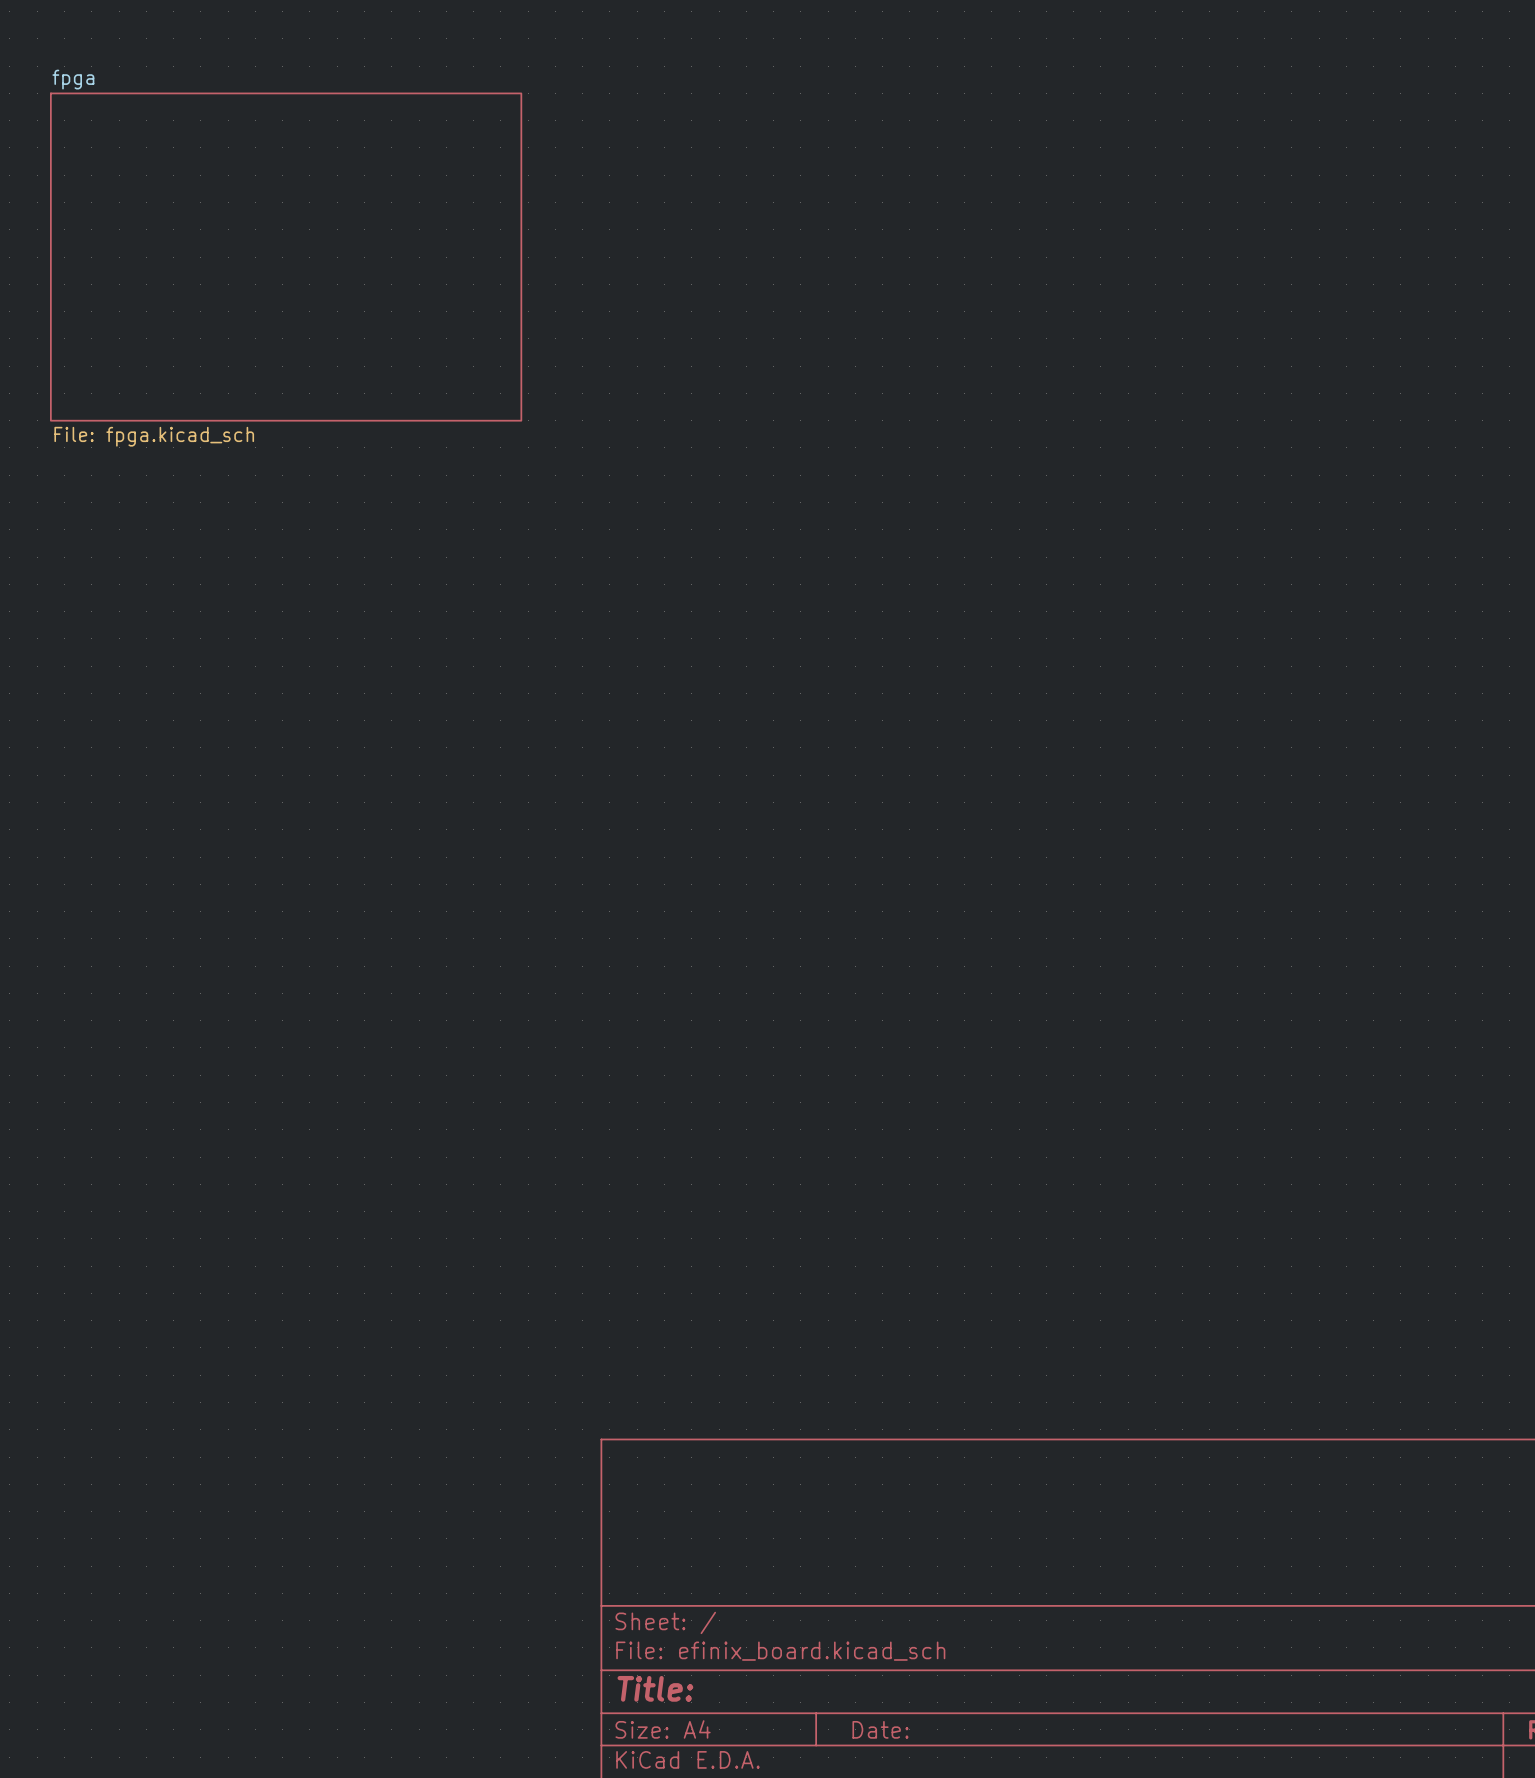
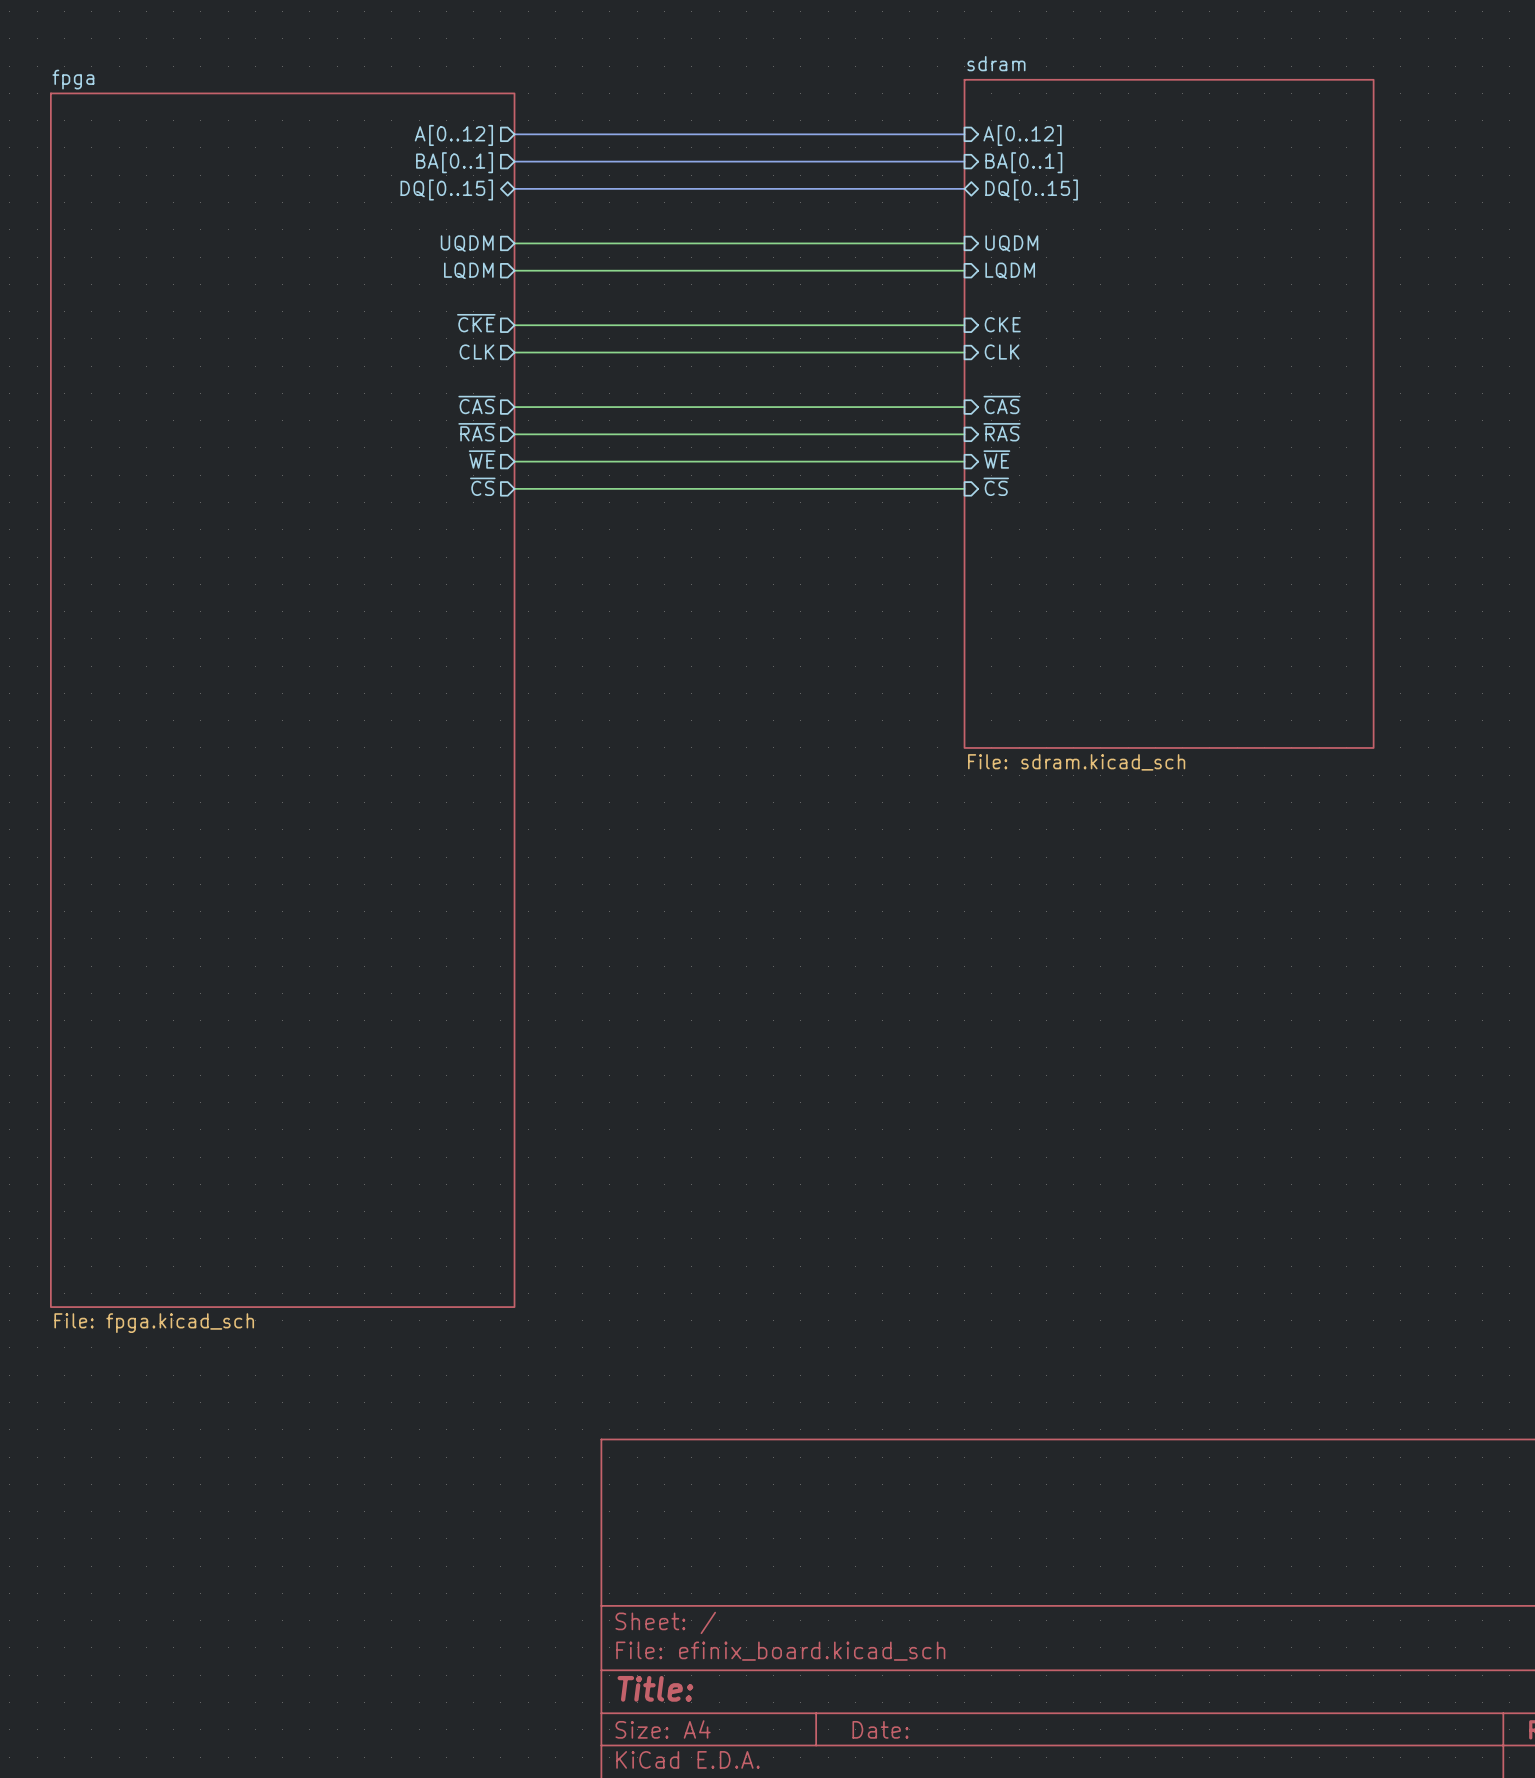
bus: none -> (514, 134) (964, 134)
sheet pin: none -> A[0..12] (453, 135)
sheet pin: none -> A[0..12] (1022, 135)
bus: none -> (514, 161) (964, 161)
sheet pin: none -> BA[0..1] (454, 162)
sheet pin: none -> BA[0..1] (1023, 162)
bus: none -> (514, 188) (964, 188)
sheet pin: none -> DQ[0..15] (446, 190)
sheet pin: none -> DQ[0..15] (1031, 190)
sheet pin: none -> UQDM (467, 243)
wire: none -> (514, 243) (964, 243)
sheet pin: none -> UQDM (1011, 243)
sheet fpga: File: fpga.kicad_sch (286, 257) -> none
sheet pin: none -> LQDM (468, 270)
wire: none -> (514, 270) (964, 270)
sheet pin: none -> LQDM (1010, 270)
sheet pin: none -> ~{CKE} (476, 323)
sheet pin: none -> CKE (1002, 324)
wire: none -> (514, 325) (964, 325)
sheet pin: none -> CLK (476, 352)
wire: none -> (514, 352) (964, 352)
sheet pin: none -> CLK (1002, 352)
sheet pin: none -> ~{CAS} (476, 404)
sheet pin: none -> ~{CAS} (1002, 404)
wire: none -> (514, 407) (964, 407)
sheet sdram: none -> File: sdram.kicad_sch (1169, 413)
sheet pin: none -> ~{RAS} (476, 432)
sheet pin: none -> ~{RAS} (1002, 432)
wire: none -> (514, 434) (964, 434)
sheet pin: none -> ~{WE} (482, 459)
sheet pin: none -> ~{WE} (996, 459)
wire: none -> (514, 461) (964, 461)
sheet pin: none -> ~{CS} (482, 486)
sheet pin: none -> ~{CS} (996, 486)
wire: none -> (514, 488) (964, 488)
sheet fpga: none -> File: fpga.kicad_sch (282, 700)

